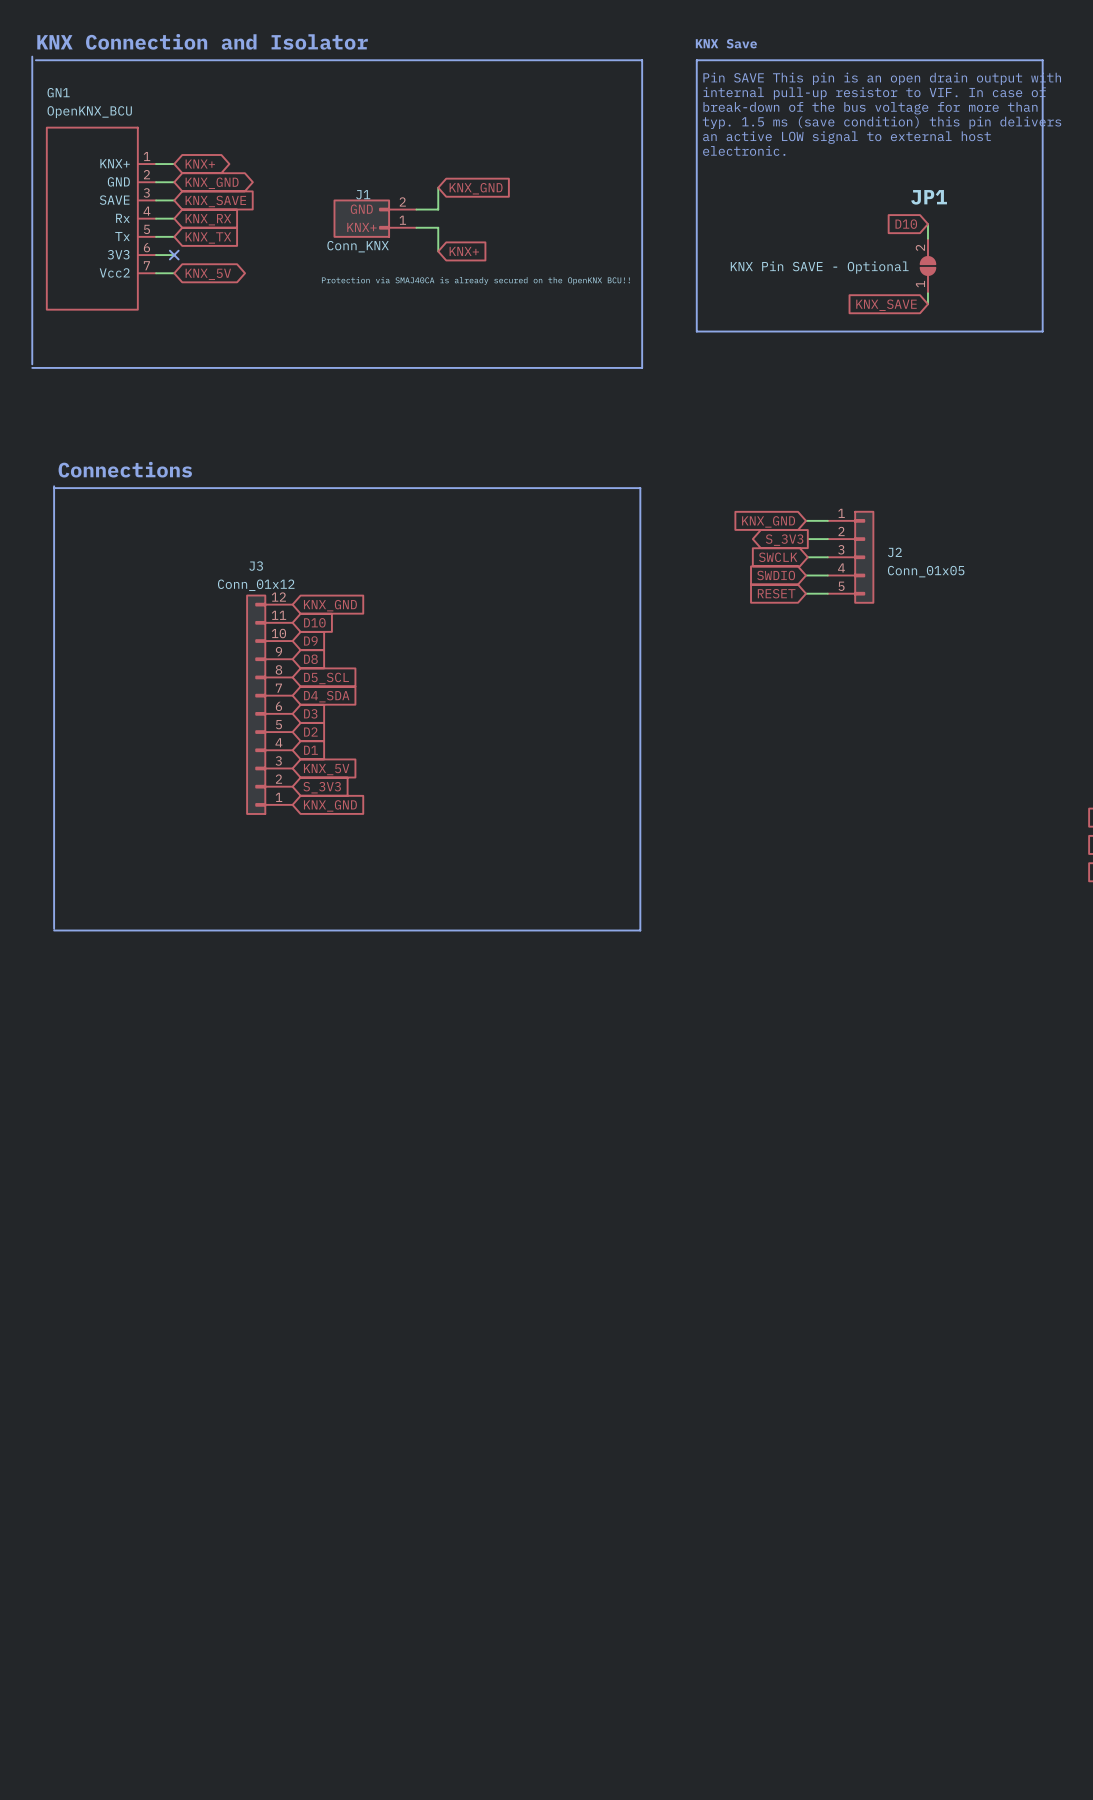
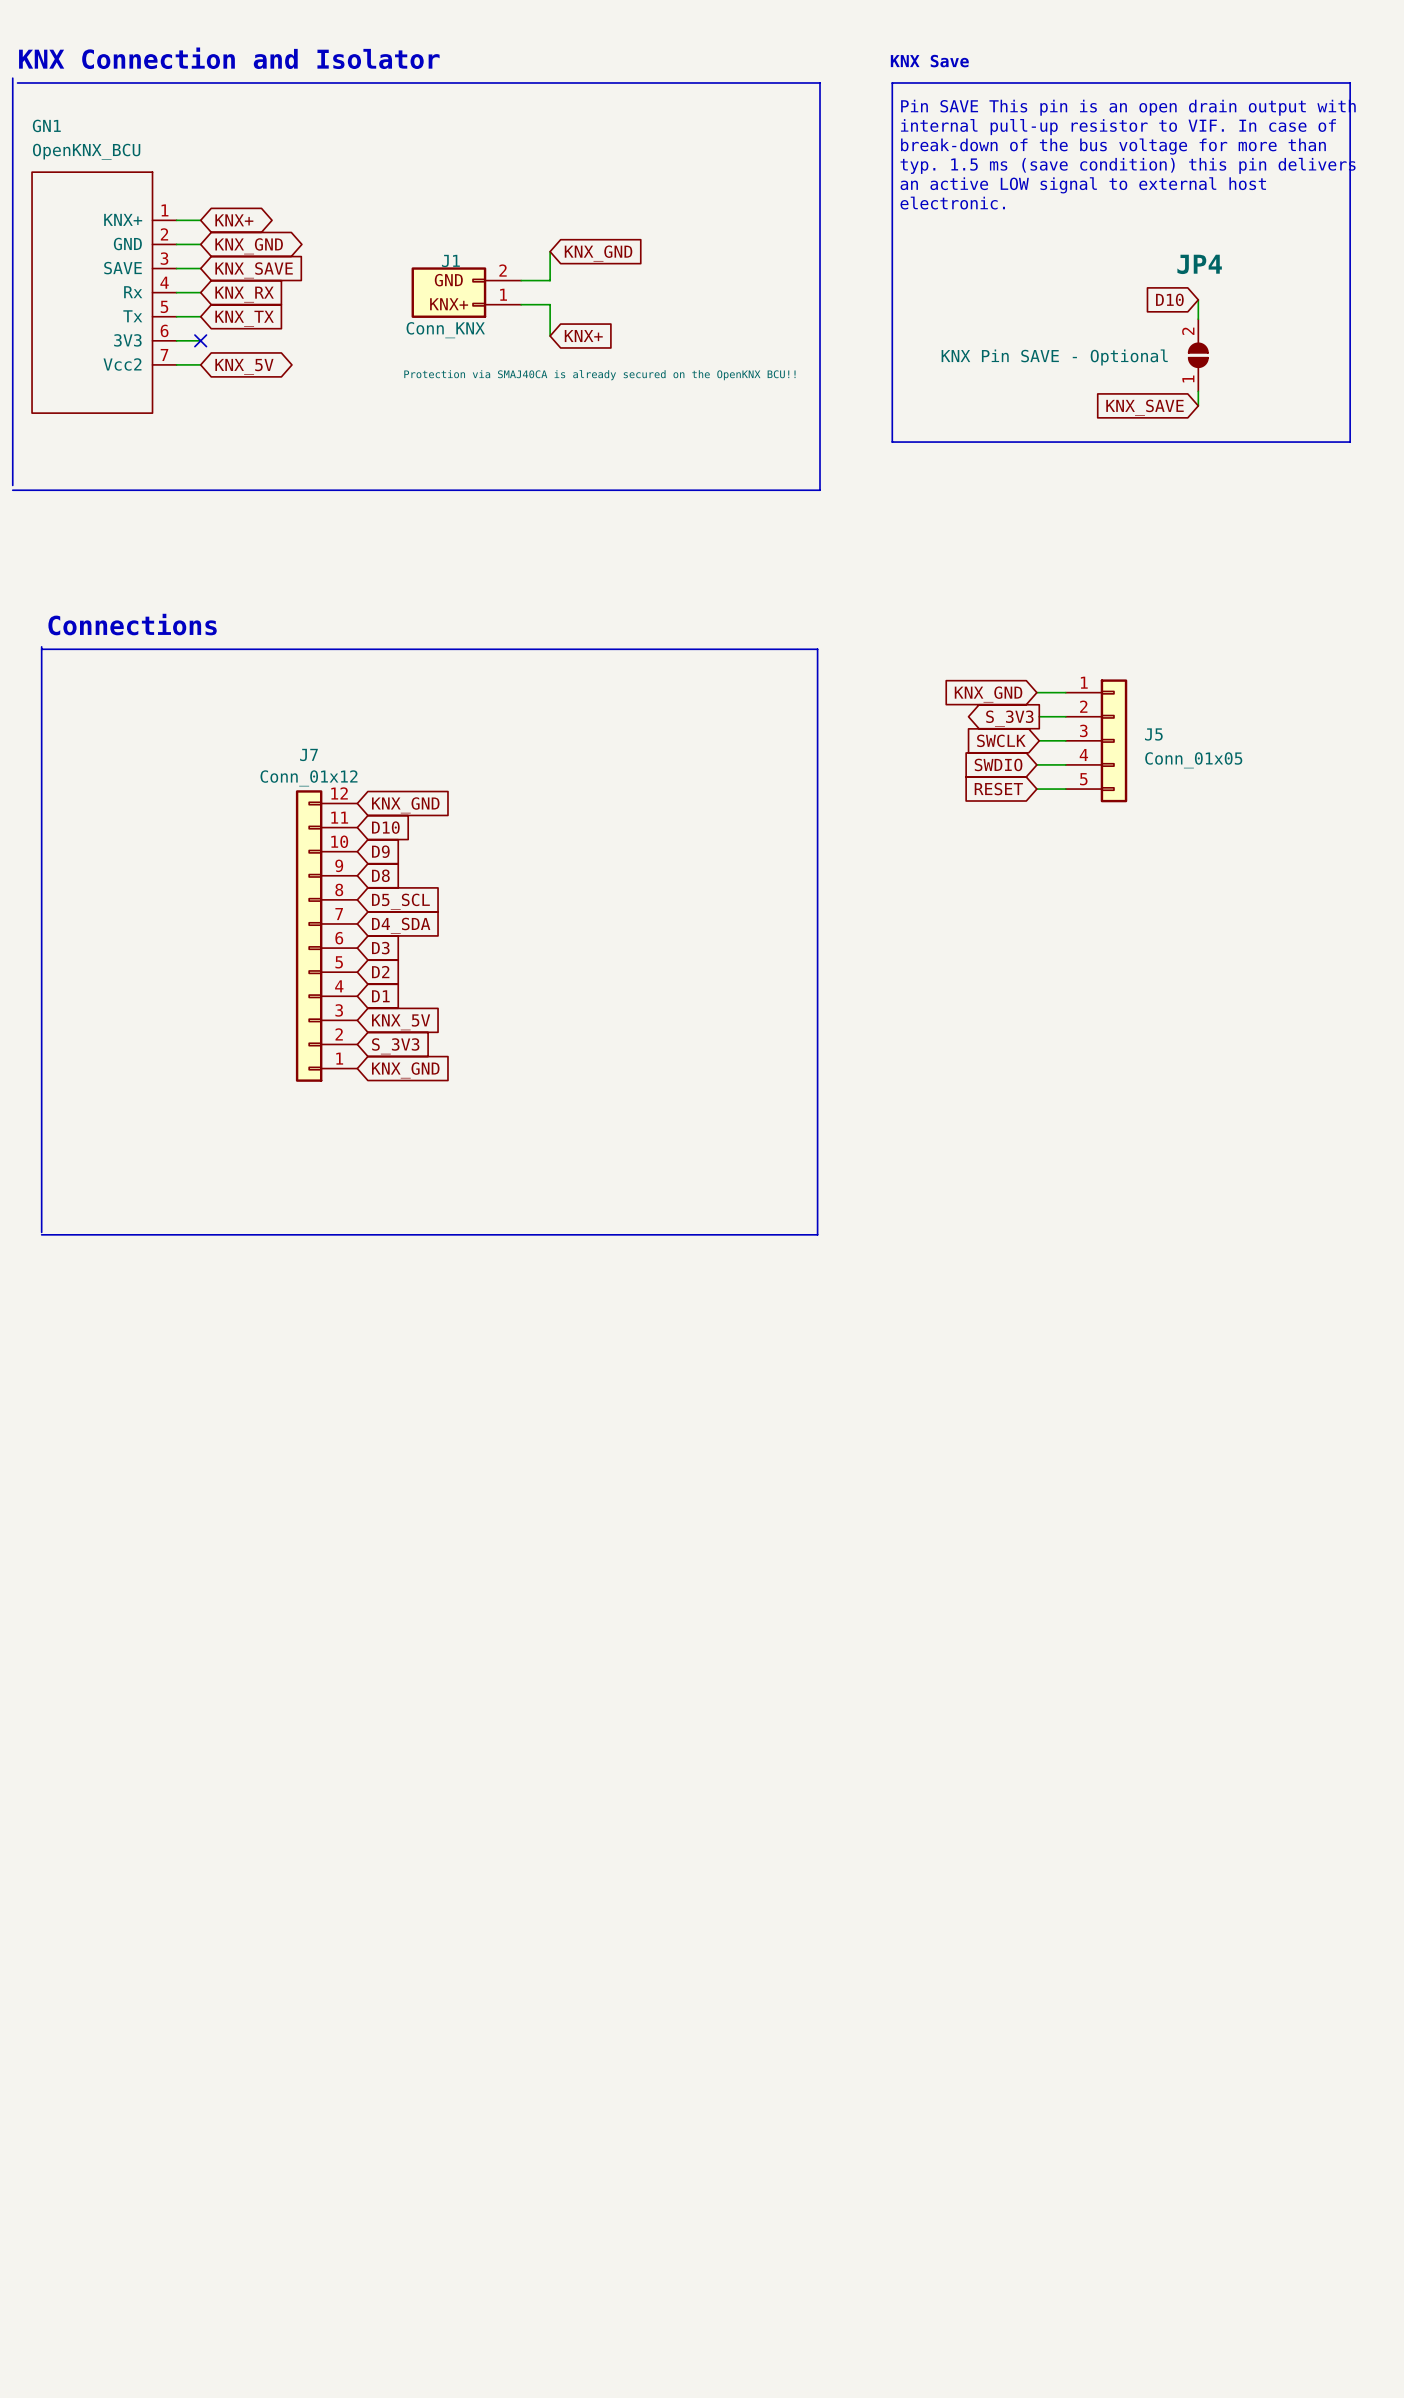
JP1 name: JP1 (929, 197) -> JP4 (1199, 264)
J2 name: J2 (894, 552) -> J5 (1153, 734)
J3 name: J3 (256, 566) -> J7 (308, 754)

